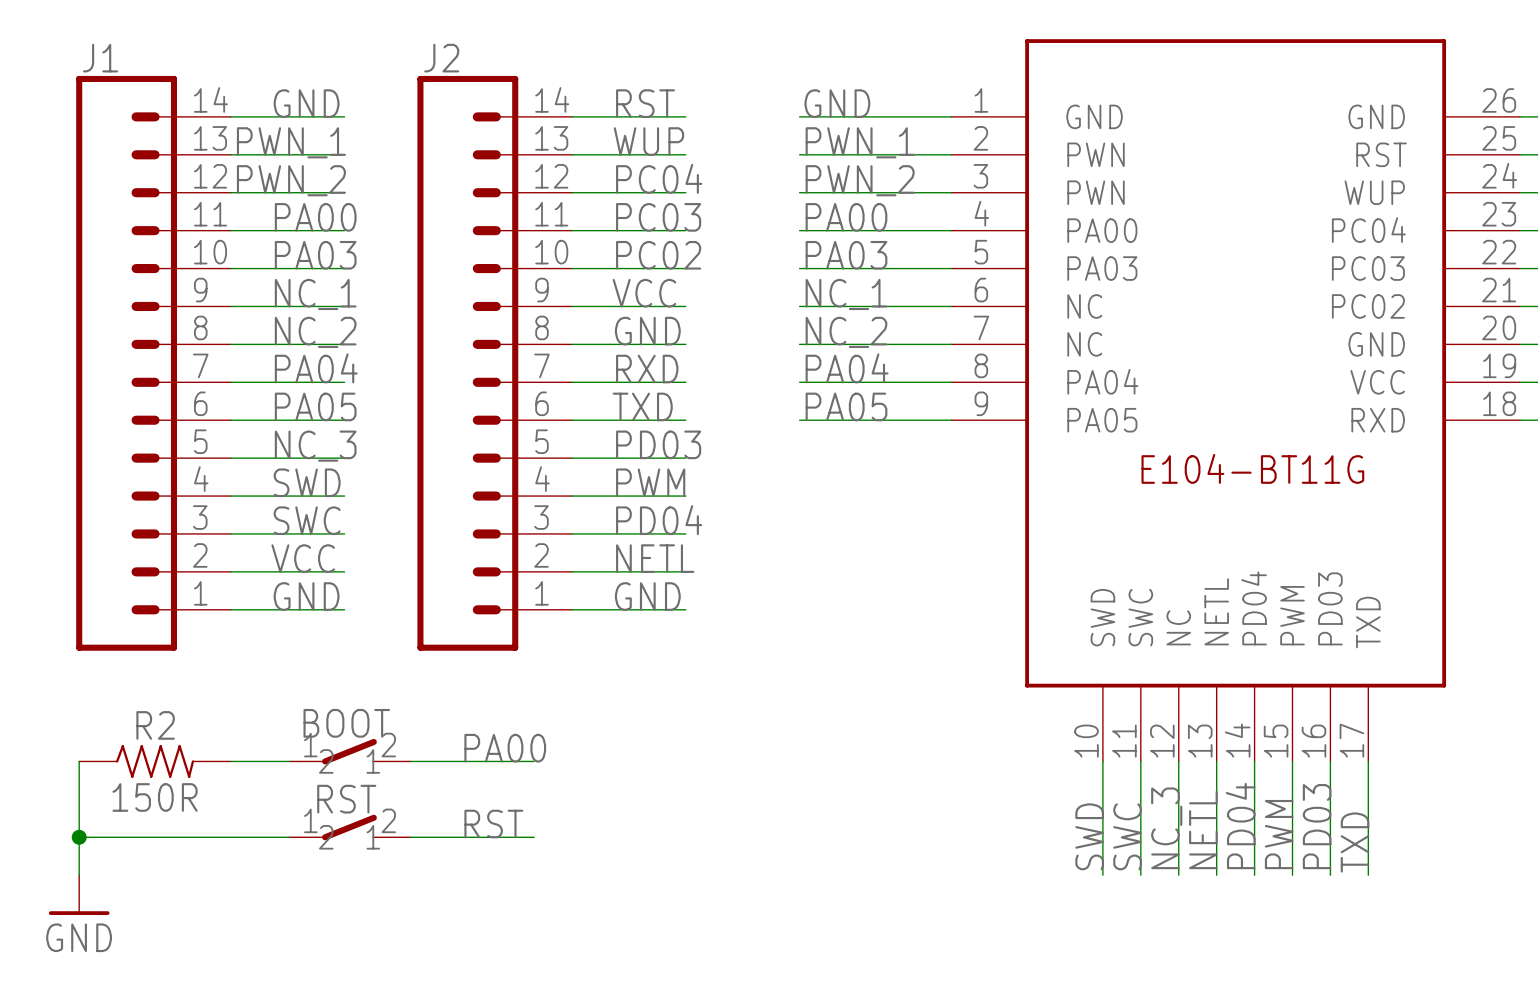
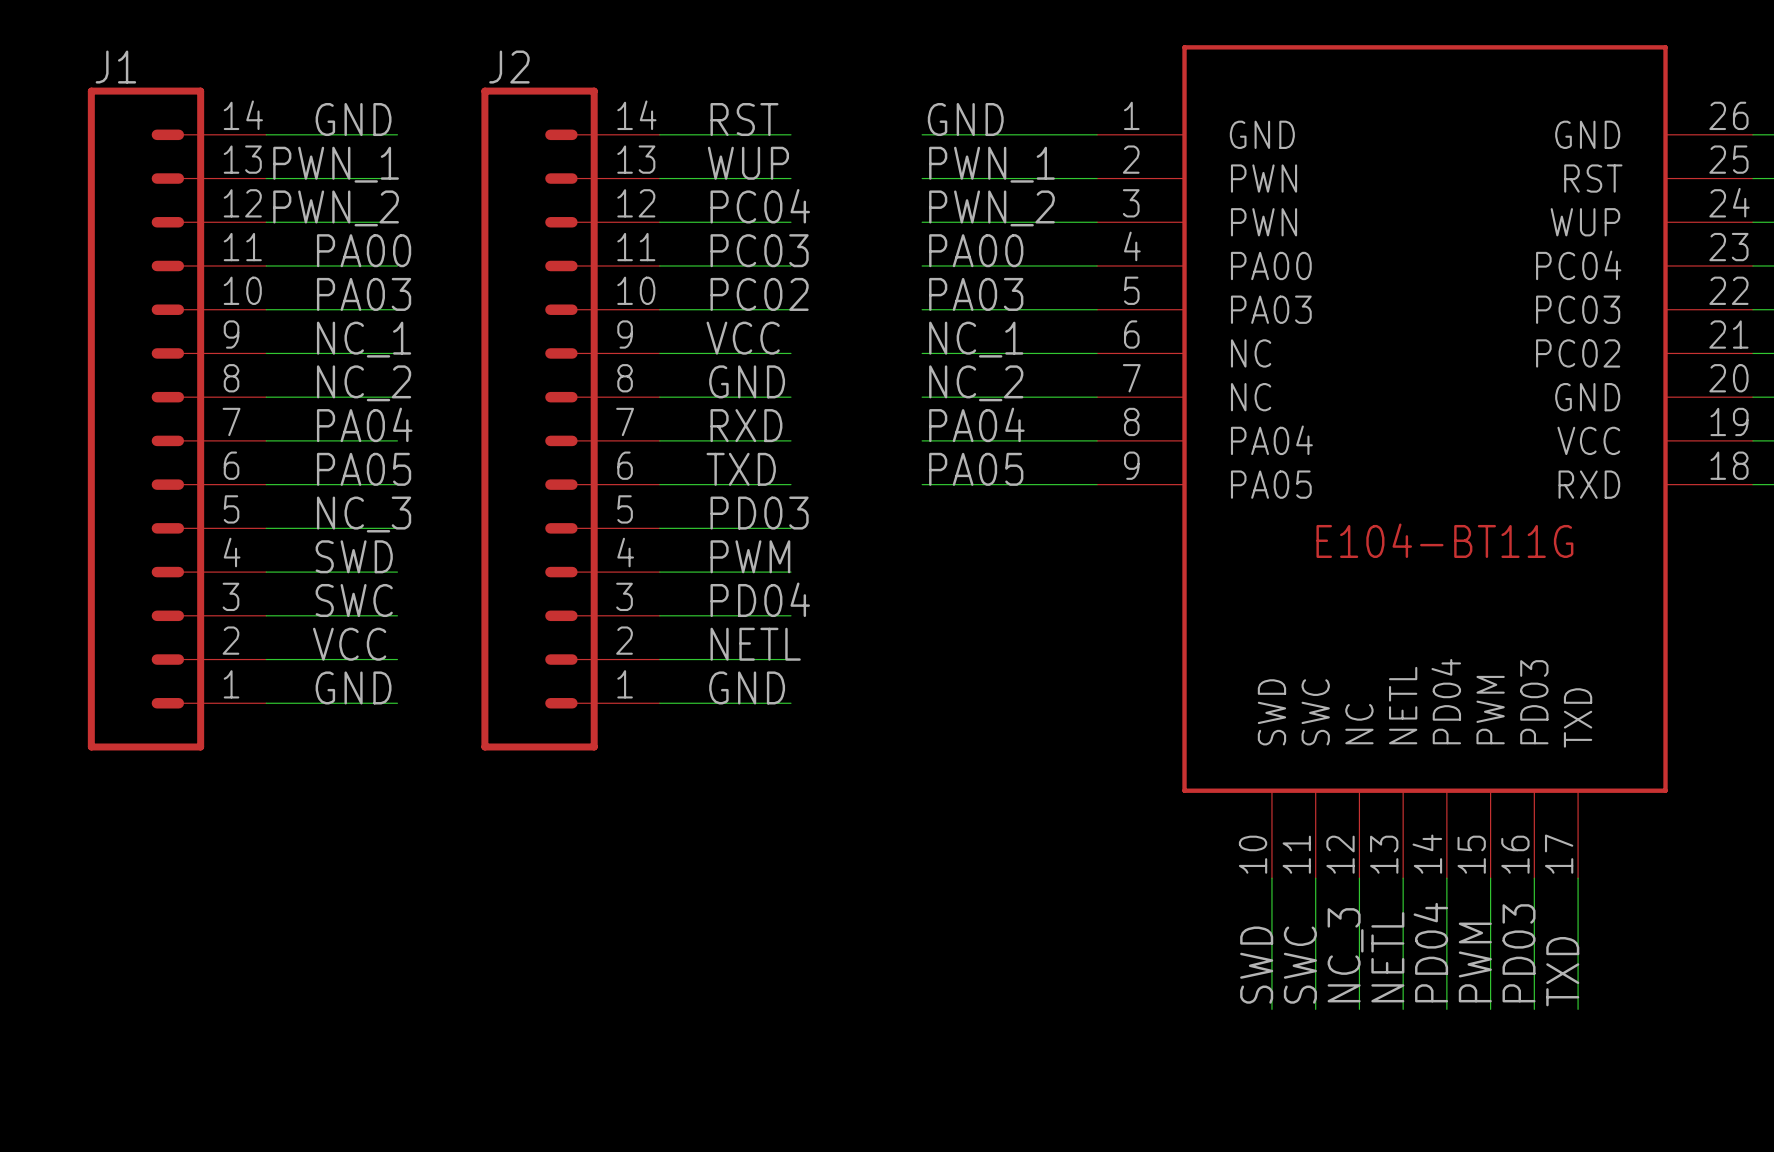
label: PA00 (505, 748) -> none
BOOT: (350, 751) -> none
wire: (79, 761) (79, 875) -> none
R2: 150R (155, 761) -> none
wire: (230, 761) (289, 761) -> none
wire: (410, 761) (534, 761) -> none
label: RST (493, 824) -> none
RST: (350, 827) -> none
wire: (79, 837) (289, 837) -> none
junction: (79, 837) -> none
wire: (410, 837) (534, 837) -> none
power symbol: GND (79, 895) -> none

